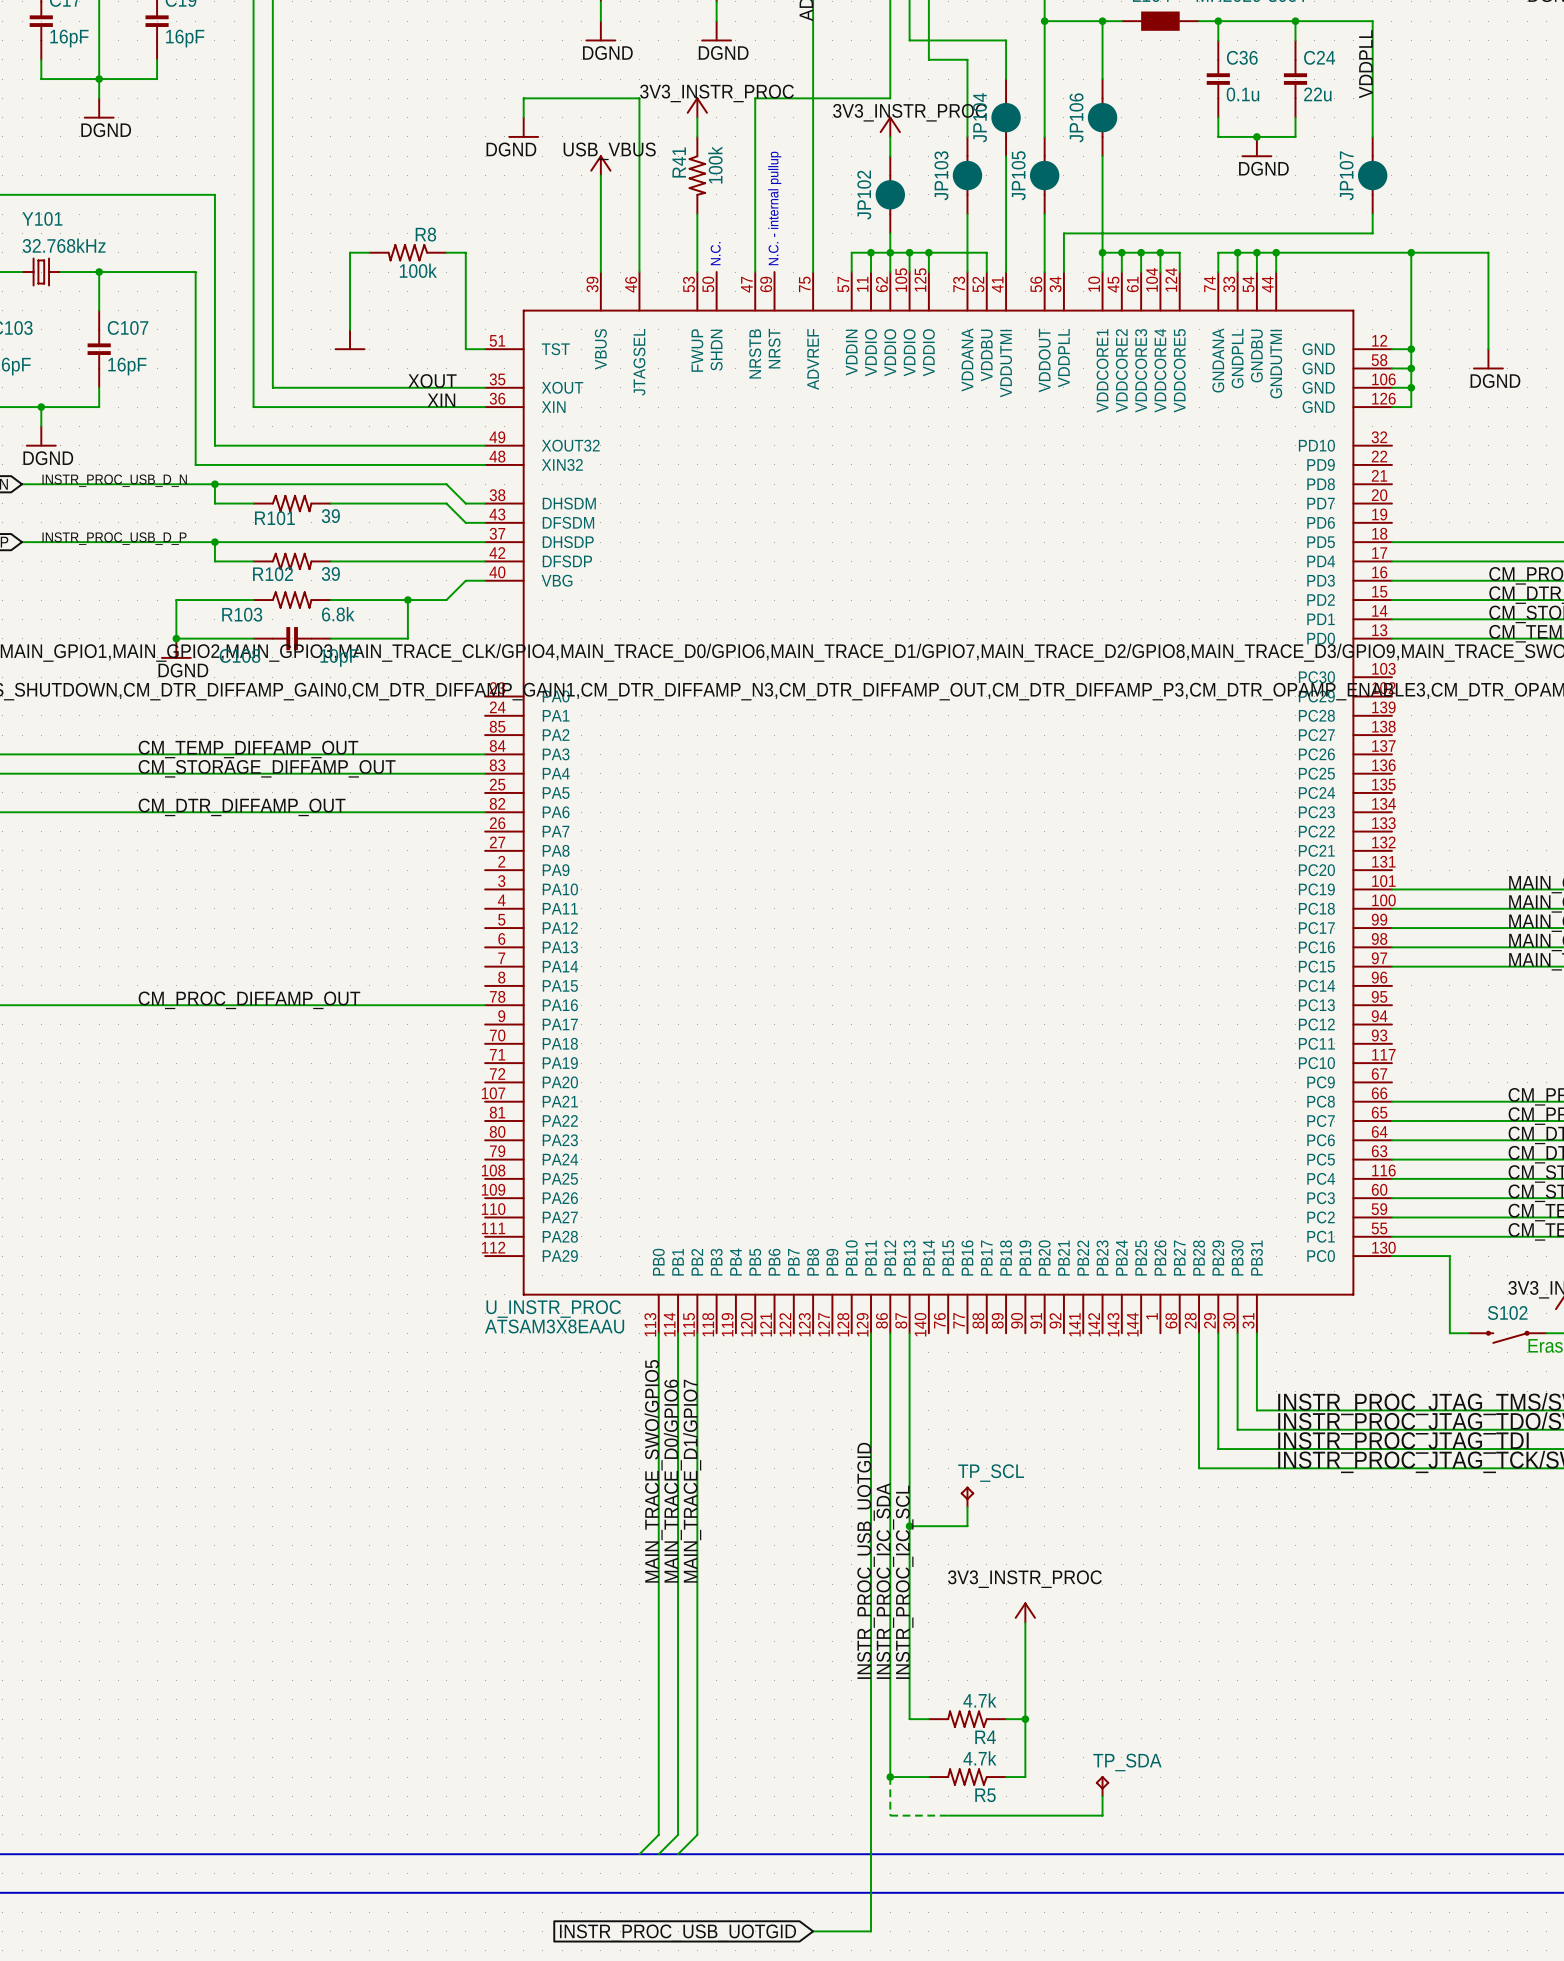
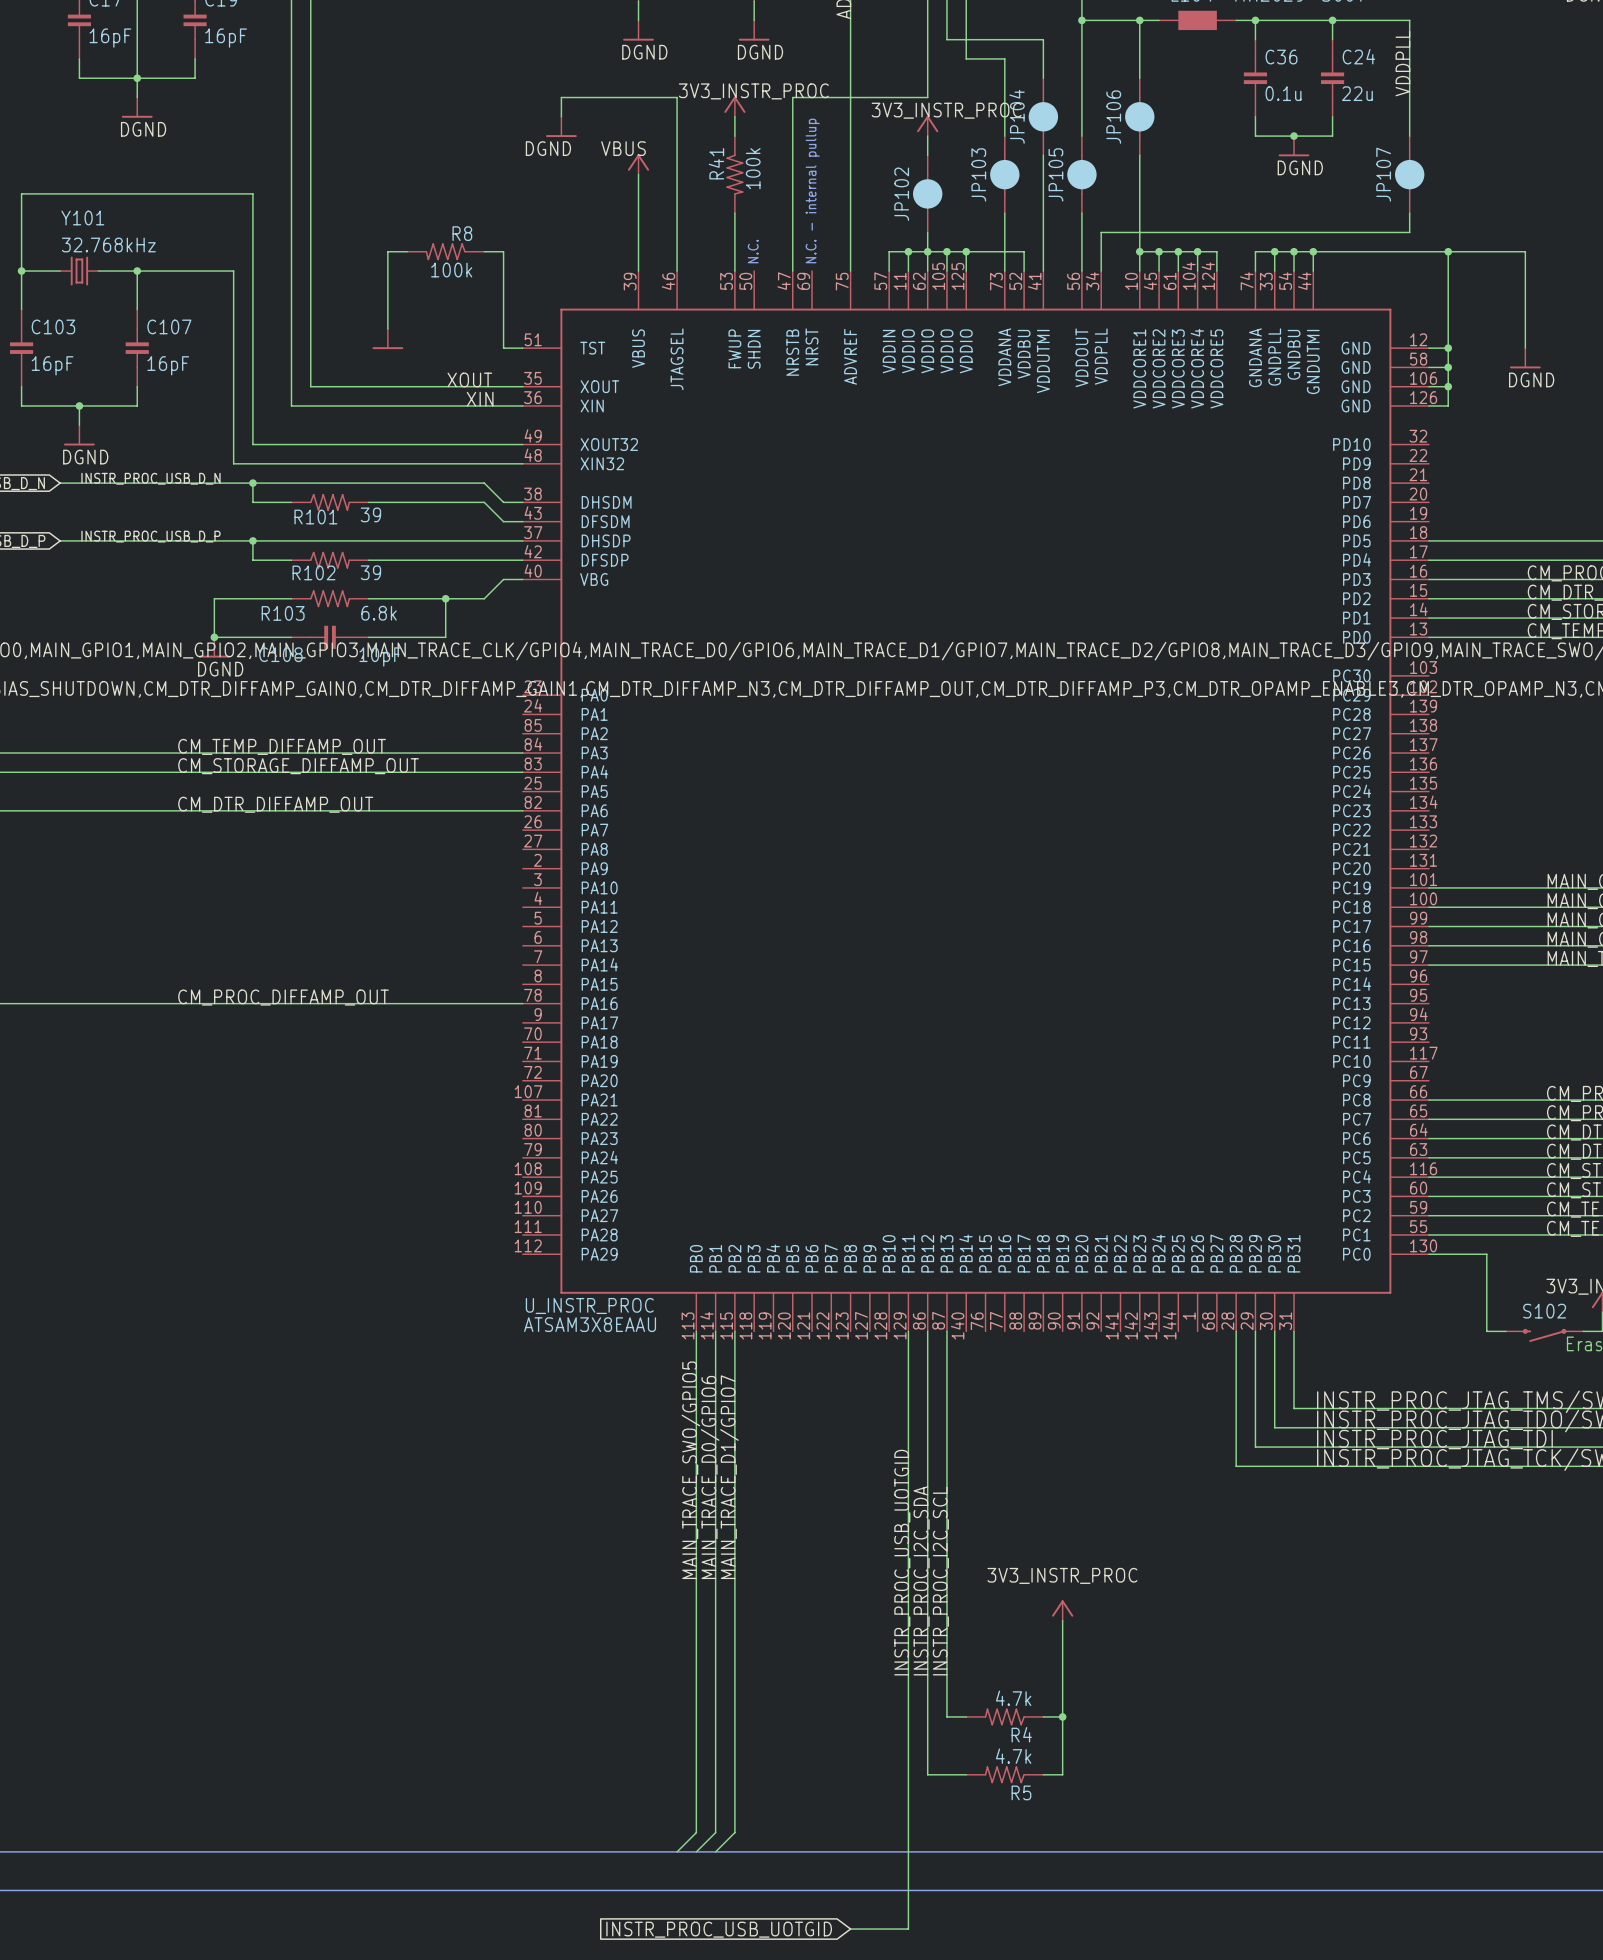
label: USB_VBUS (609, 151) -> VBUS (623, 148)
TP_SCL: (967, 1496) -> none
wire: (967, 1506) (967, 1526) (909, 1526) -> none
junction: (909, 1526) -> none
wire: (890, 1777) (890, 1815) (1102, 1815) (1102, 1796) -> none
junction: (890, 1777) -> none
TP_SDA: (1102, 1786) -> none

